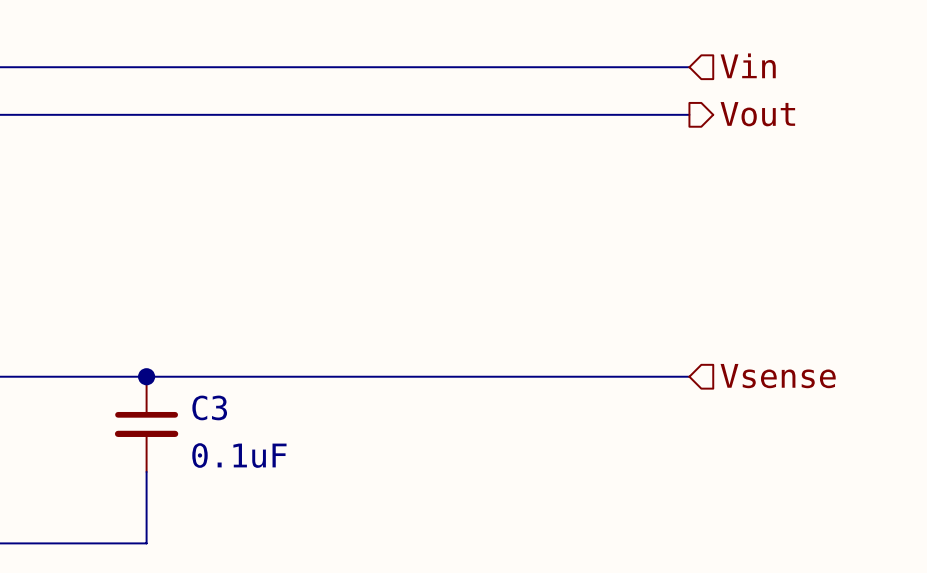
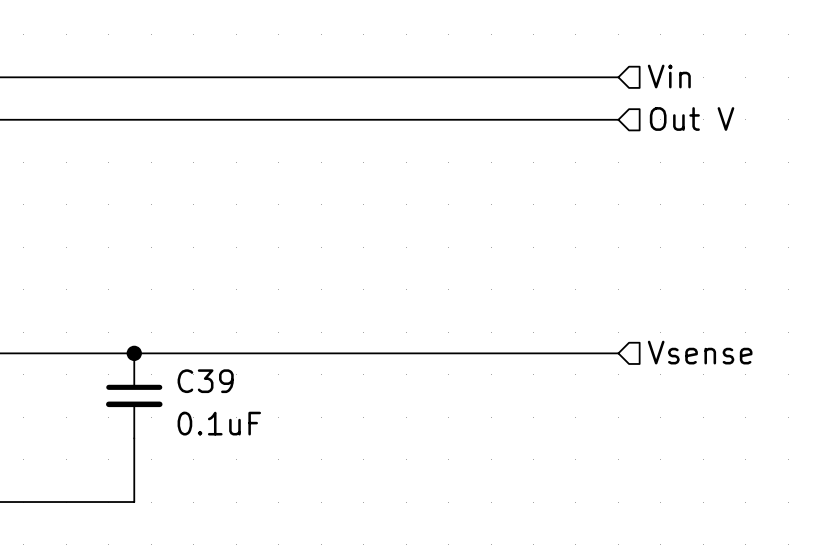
hierarchical label shape: output (757, 114) -> input (692, 118)
hierarchical label: Vout (757, 114) -> Out V (692, 118)
C3 name: C3 (209, 407) -> C39 (205, 381)

